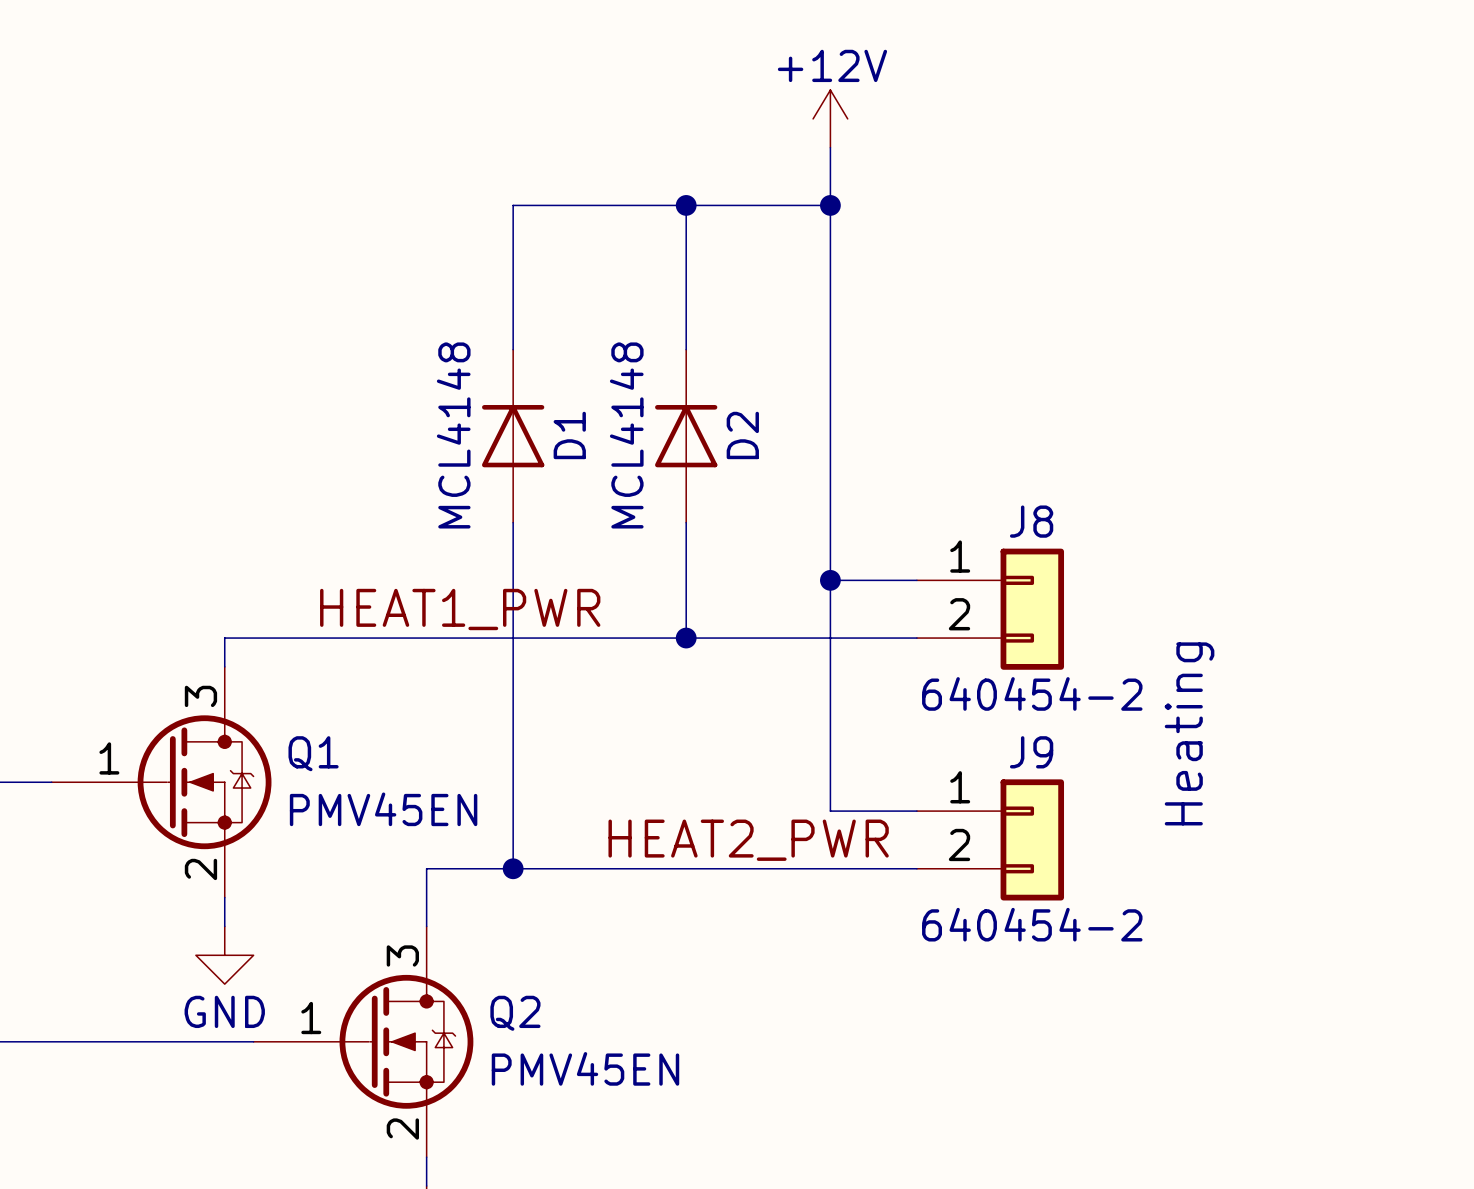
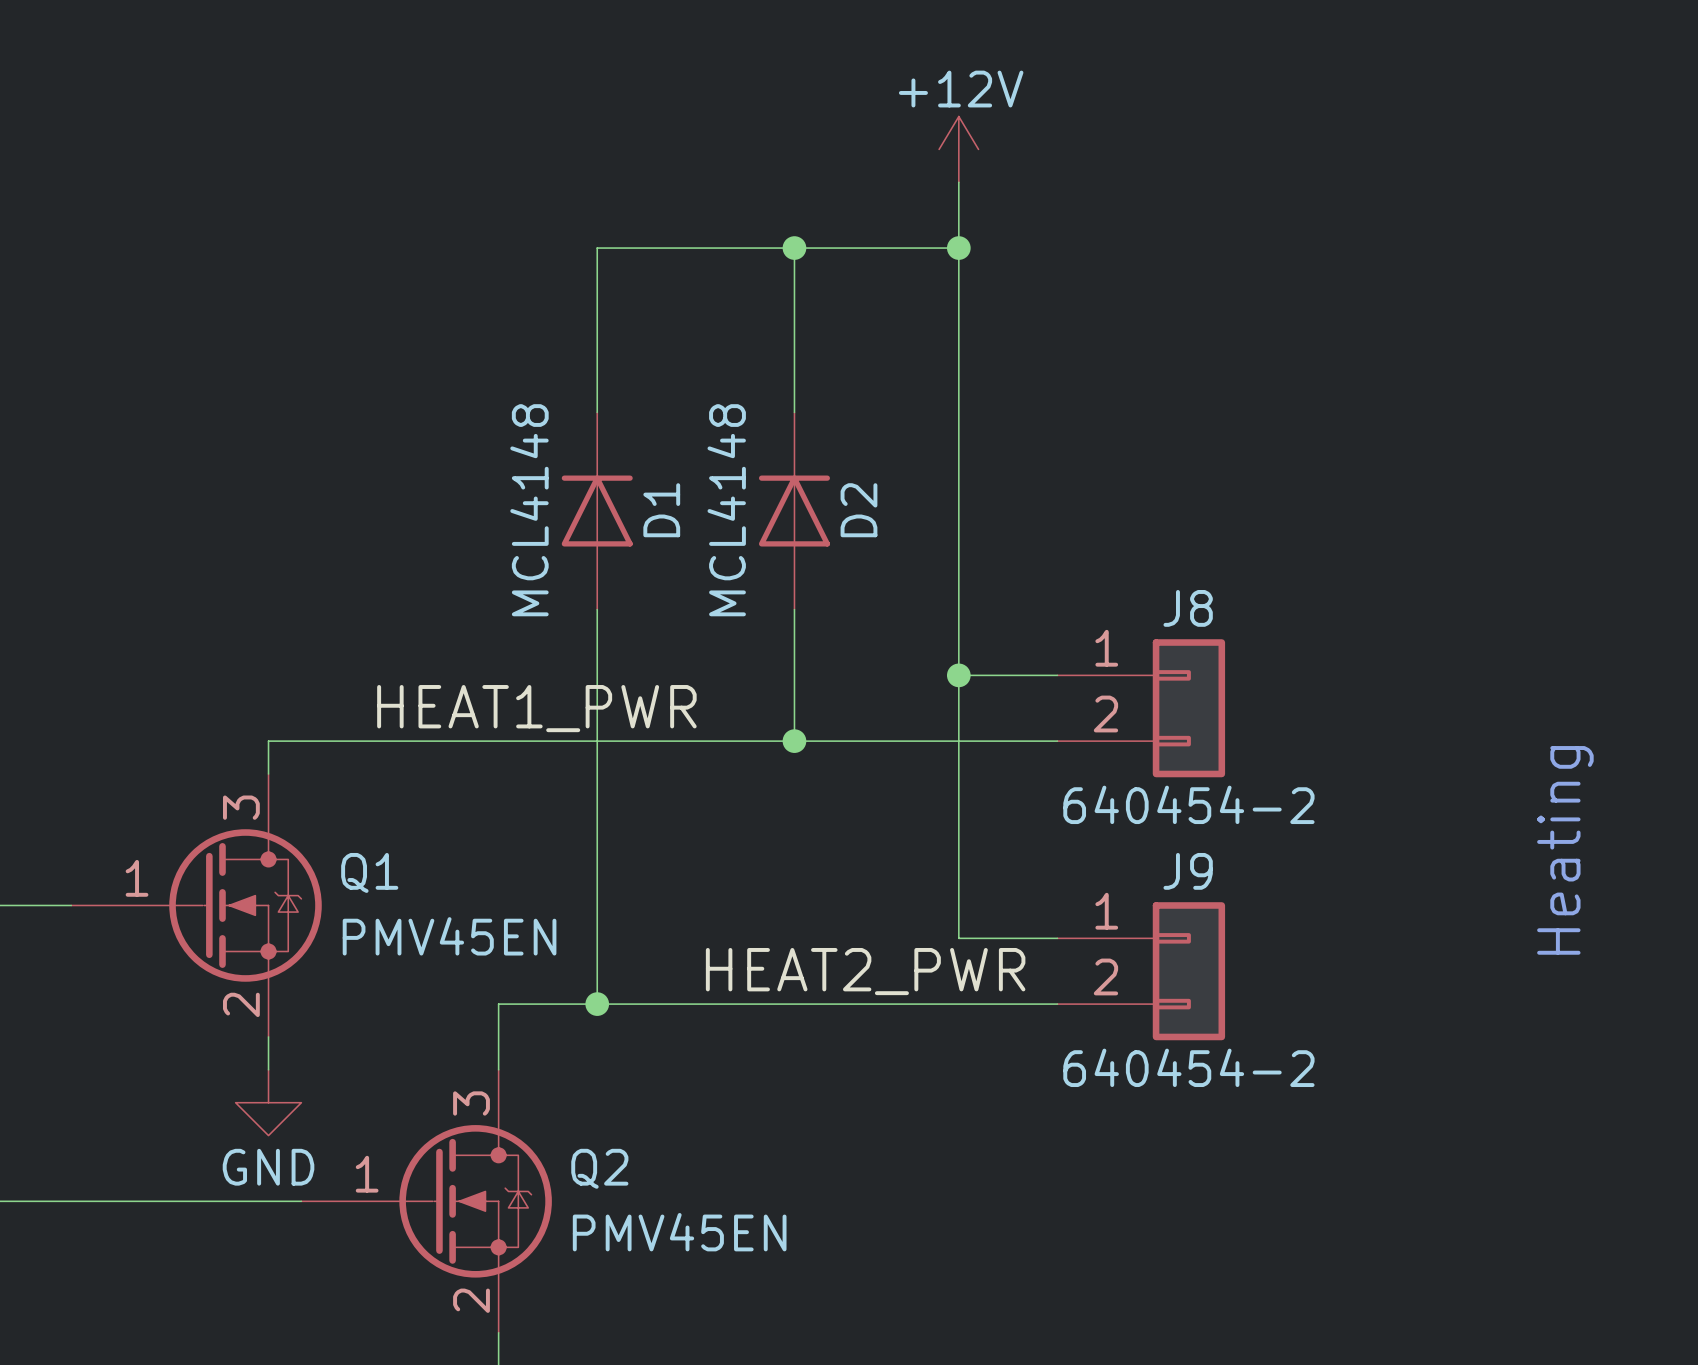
text position: Heating (1189, 733) -> Heating (1565, 850)

